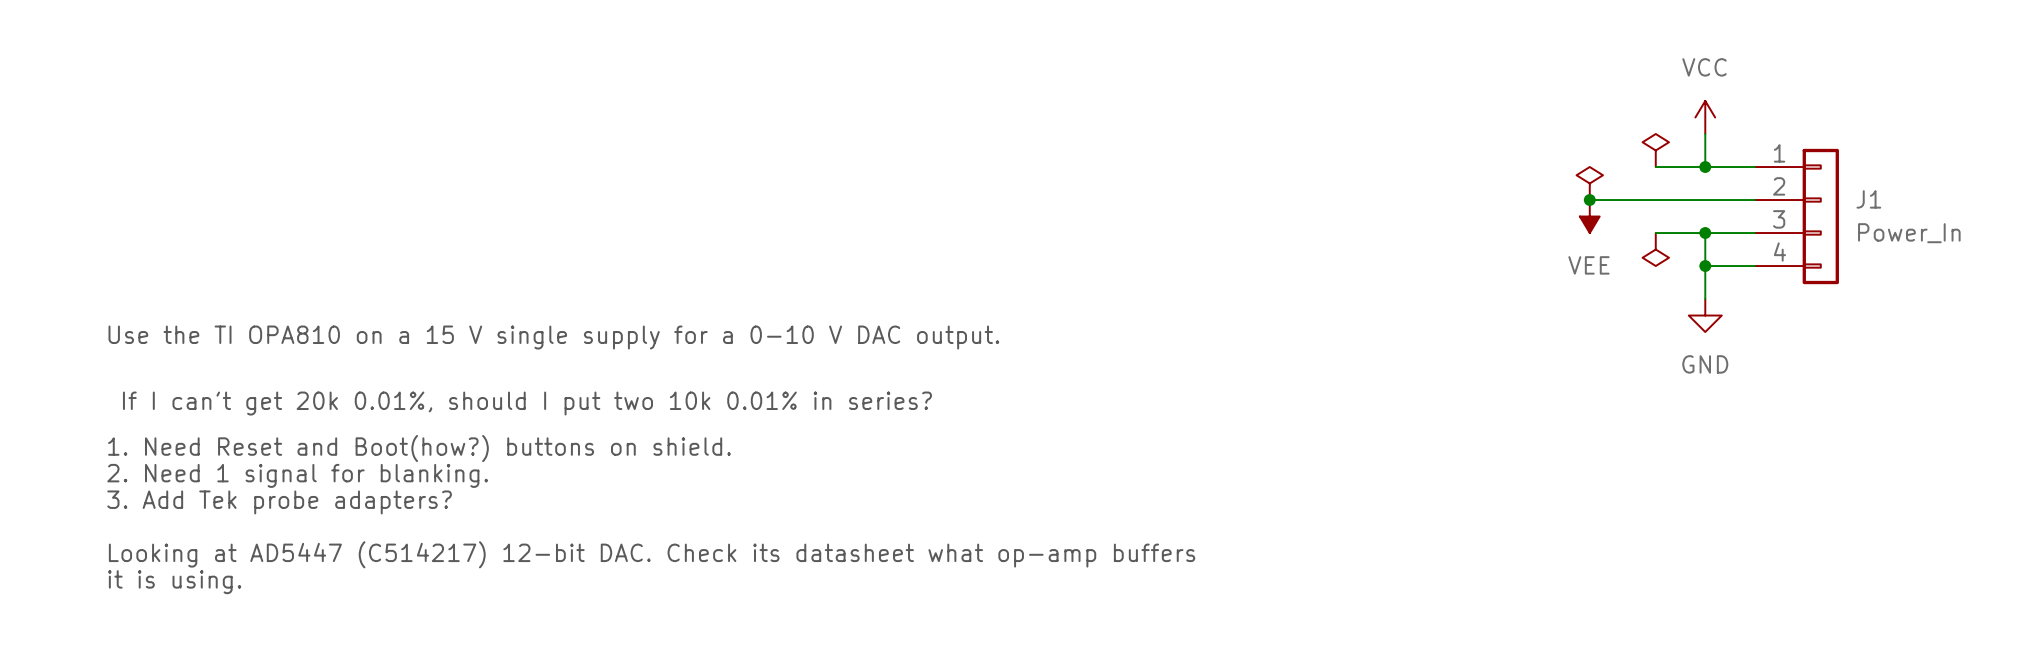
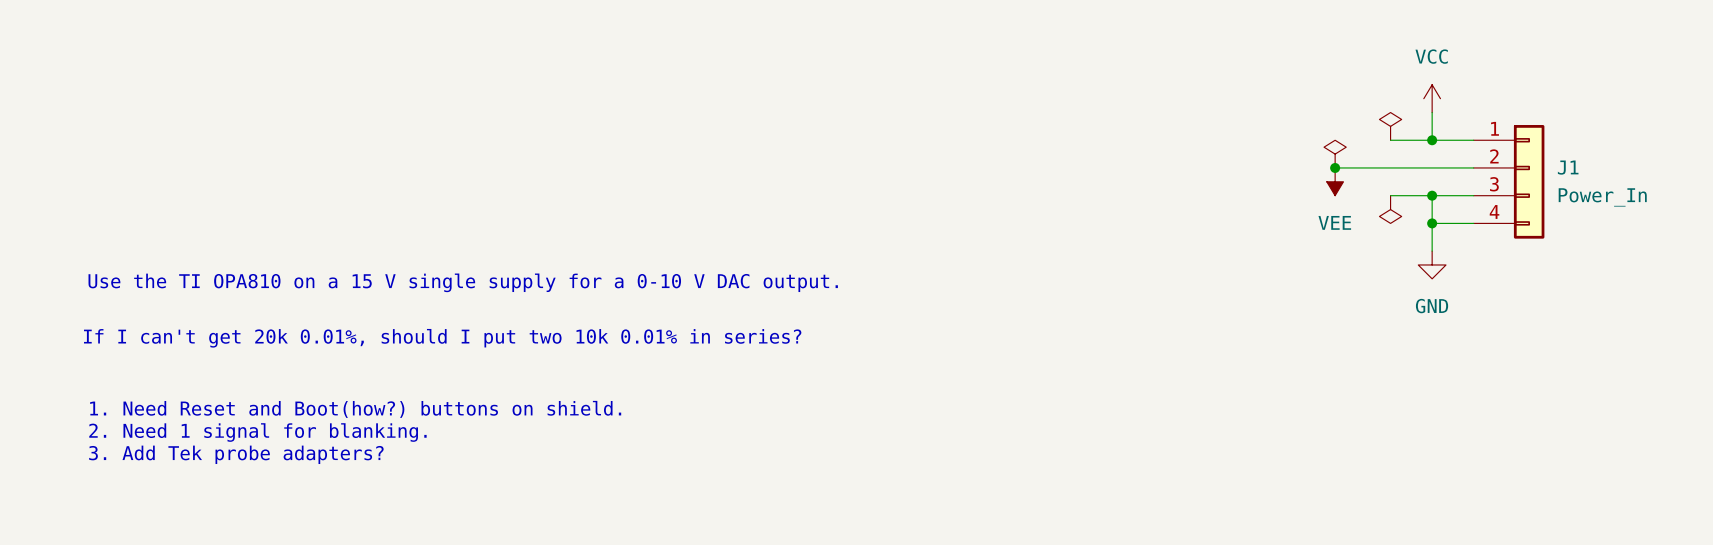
text position: 1. Need Reset and Boot(how?) buttons on shield. (419, 448) -> 1. Need Reset and Boot(how?) buttons on shield. (355, 409)
text position: 2. Need 1 signal for blanking. (297, 475) -> 2. Need 1 signal for blanking. (257, 432)
text position: 3. Add Tek probe adapters? (279, 502) -> 3. Add Tek probe adapters? (236, 454)
text: Looking at AD5447 (C514217) 12-bit DAC. Check its datasheet what op-amp buffers (652, 554) -> none
text: it is using. (174, 582) -> none

